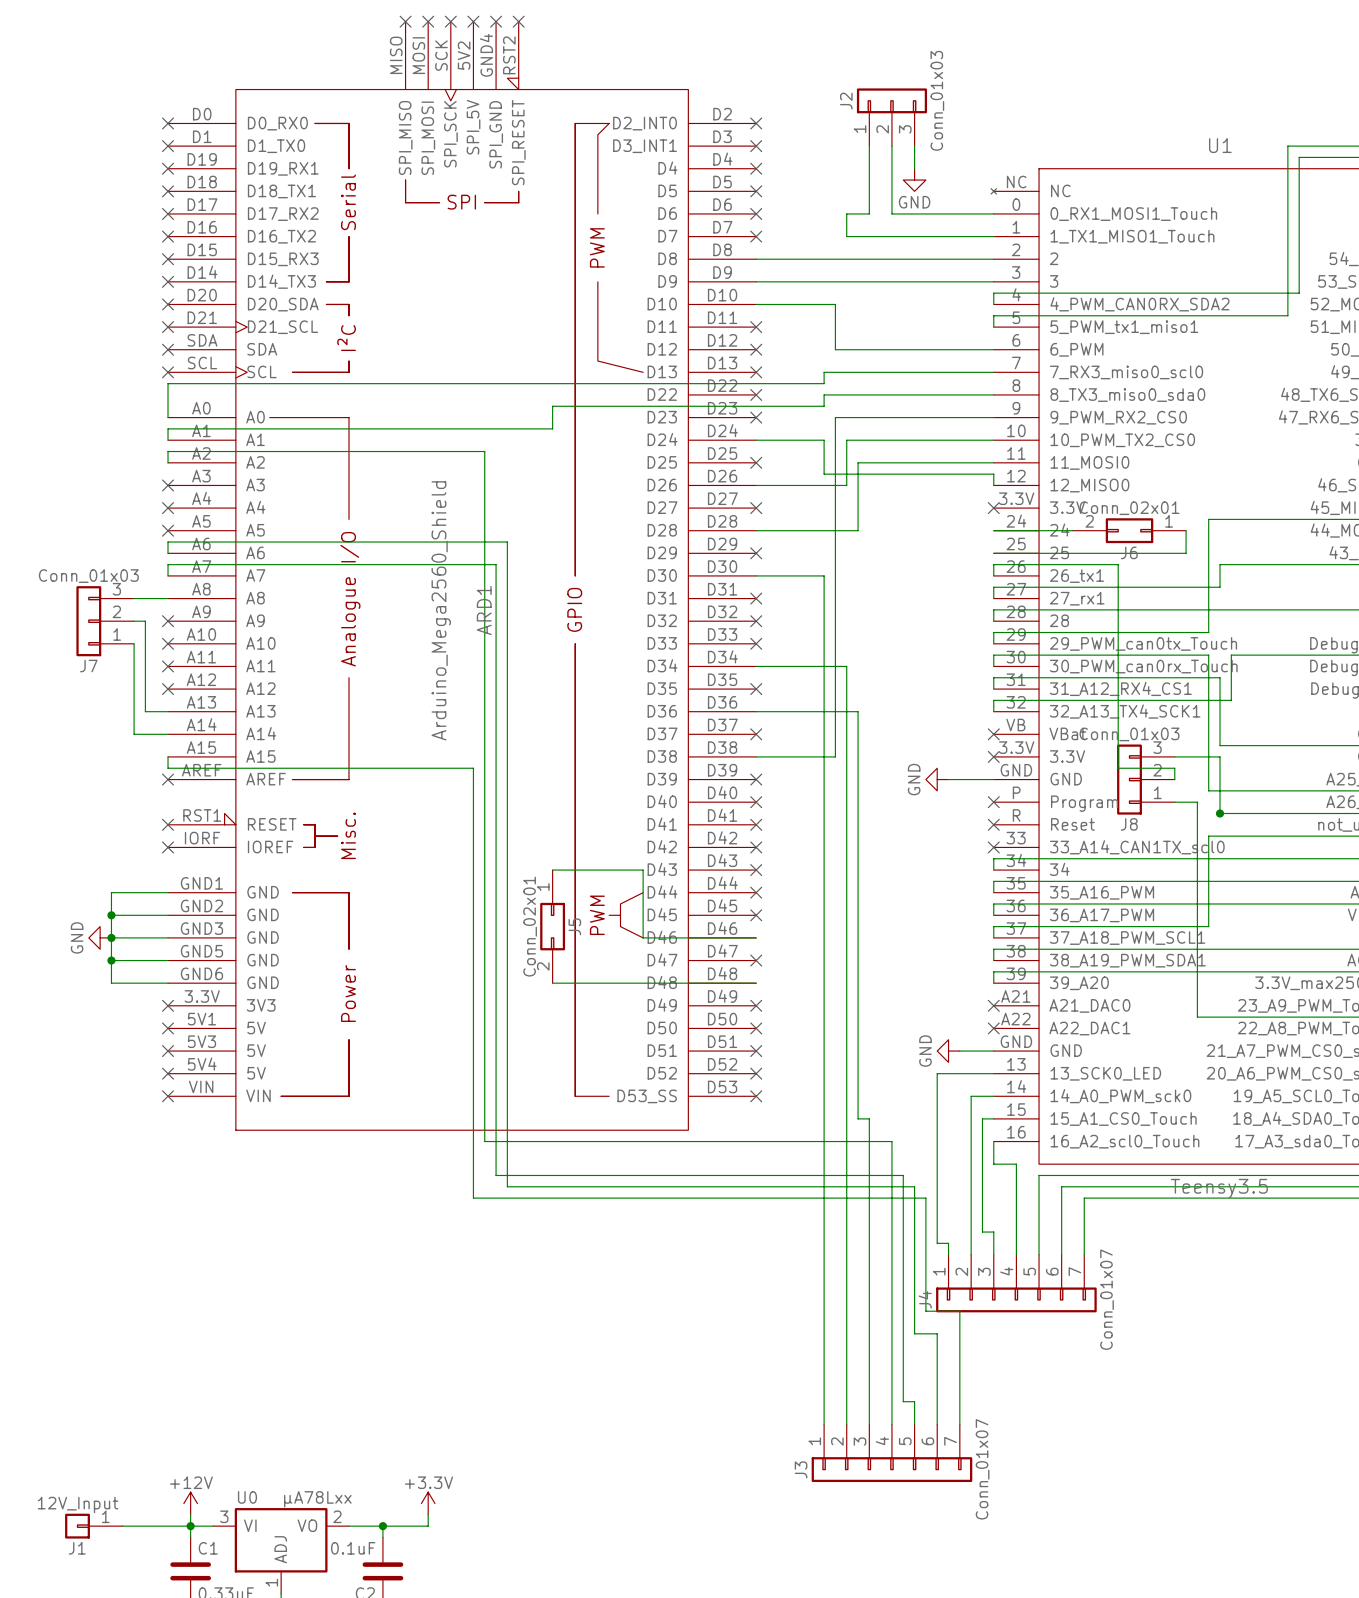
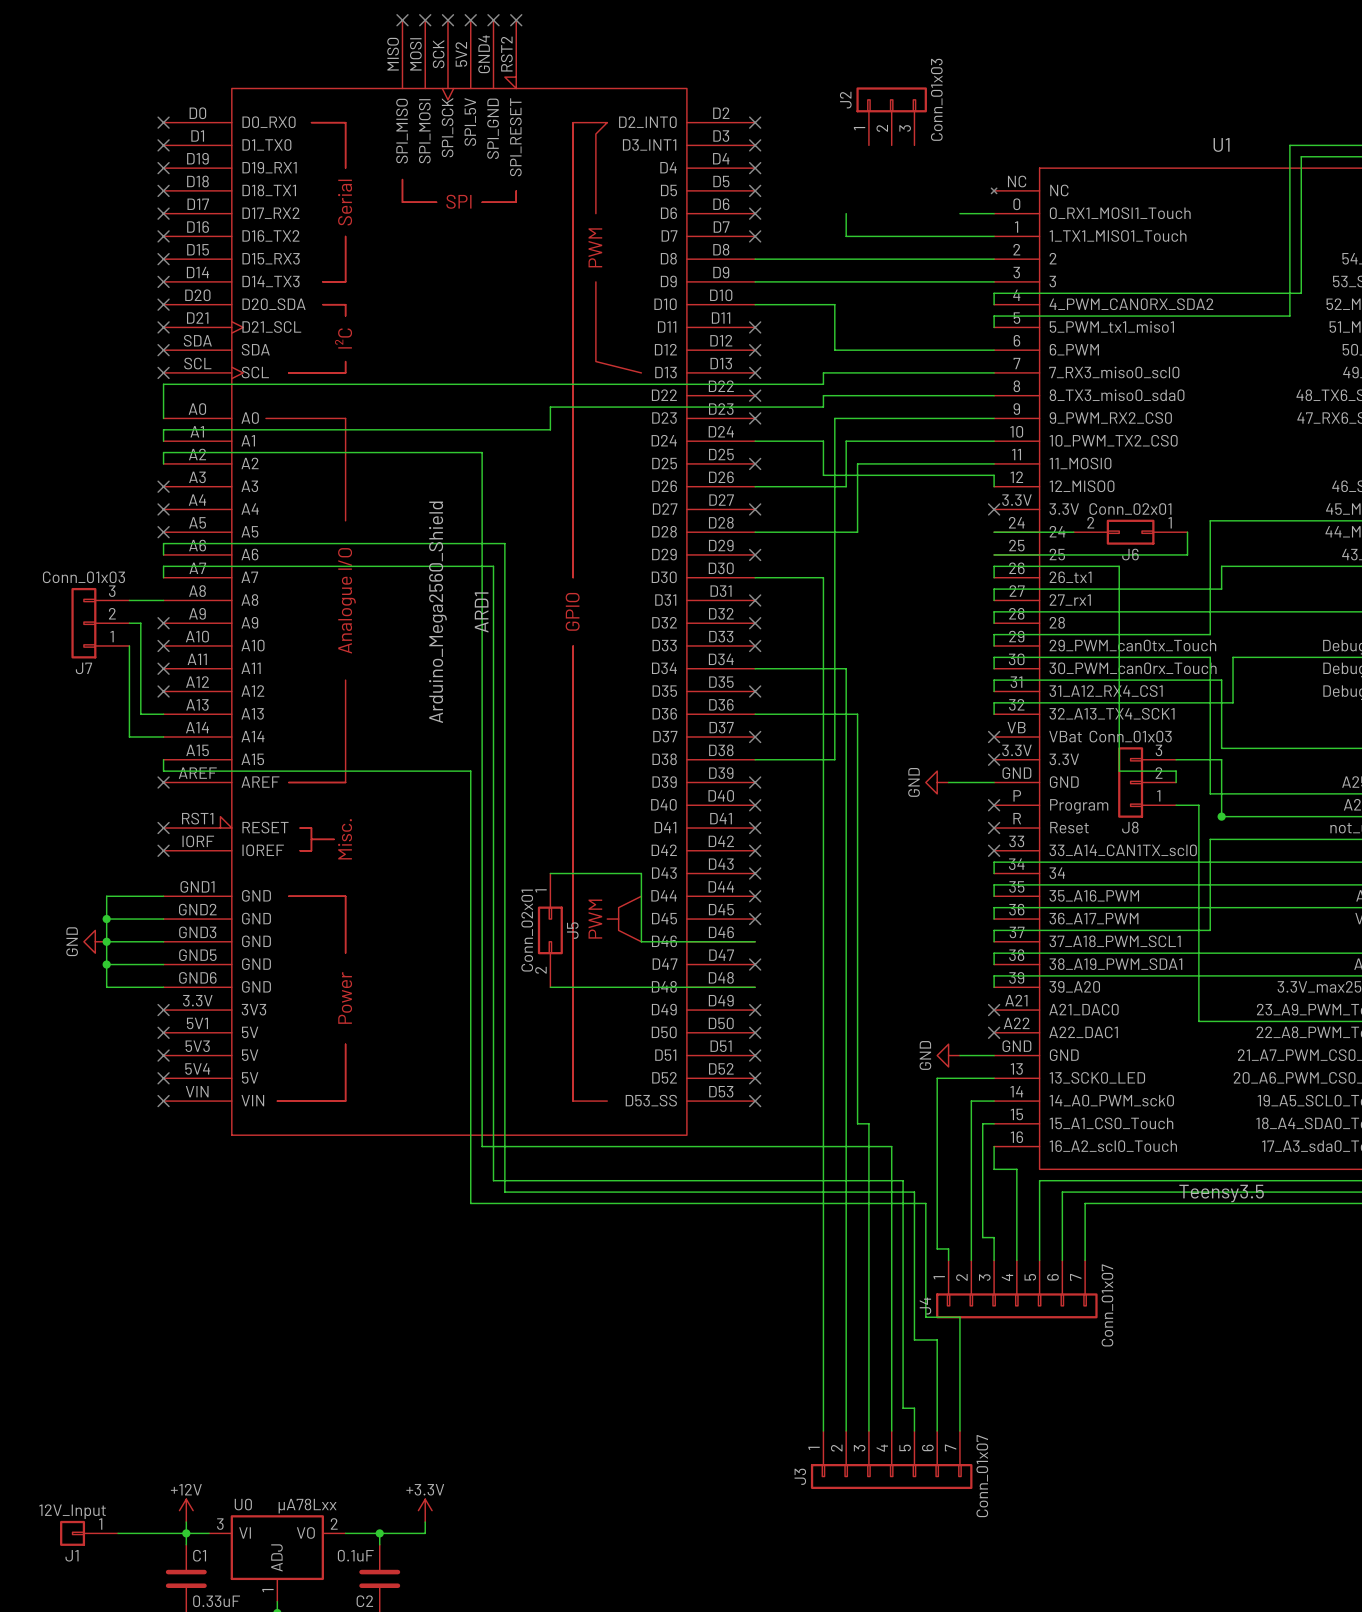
wire: (869, 146) (869, 213) (846, 213) -> none
wire: (891, 146) (891, 213) (959, 213) -> none
wire: (914, 146) (914, 168) -> none
power symbol: GND (914, 180) -> none

